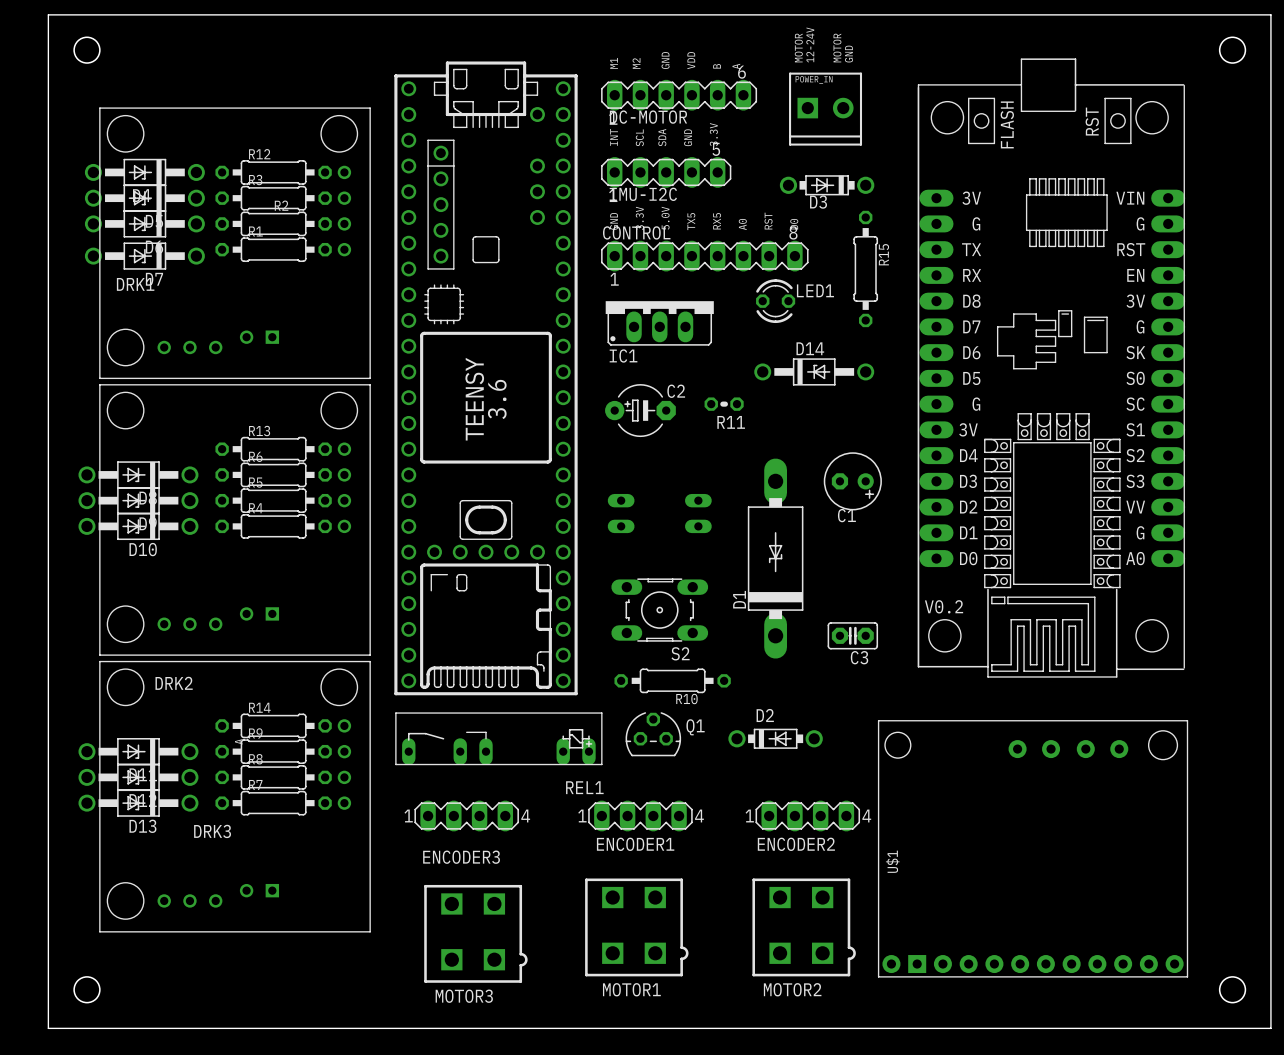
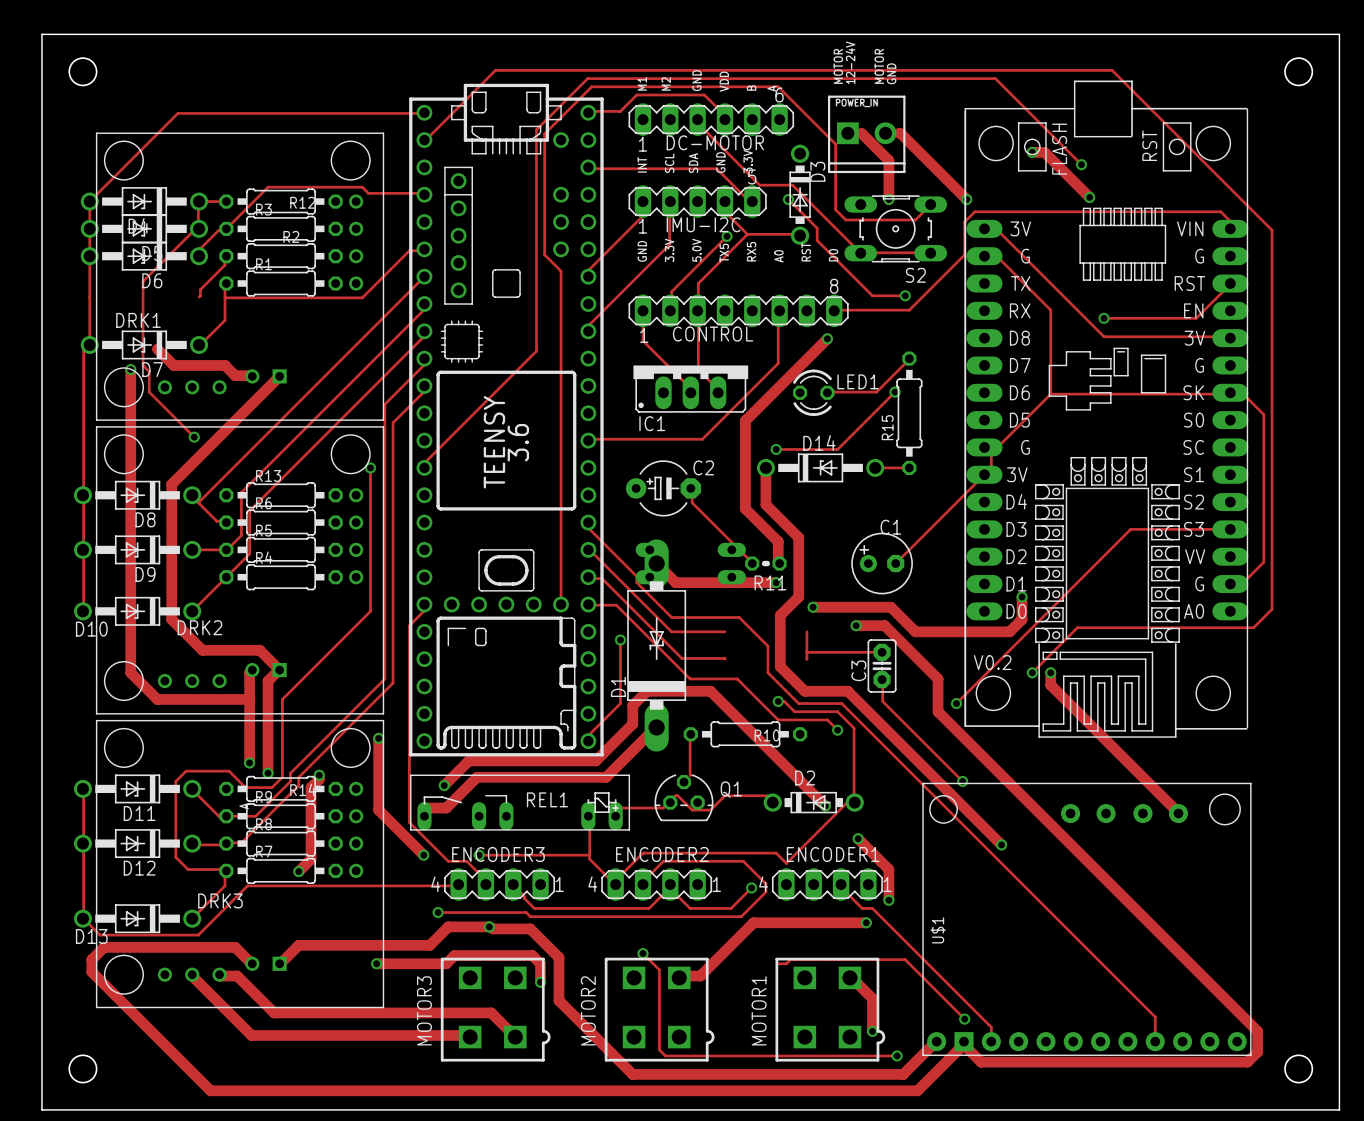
track: none -> (424, 112) (177, 113) (89, 201) (89, 344) (83, 351) (82, 611)
track: none -> (588, 112) (620, 111) (636, 95) (704, 95) (724, 115) (724, 119)
track: none -> (697, 119) (698, 123) (759, 185) (792, 185) (860, 253) (930, 253)
track: none -> (861, 133) (888, 160) (888, 199)
track: none -> (899, 133) (966, 199)
track: none -> (424, 140) (495, 70) (1112, 70) (1272, 230) (1272, 609) (1253, 627) (1077, 627) (1032, 672)
DC-MOTOR name position: DC-MOTOR (648, 117) -> DC-MOTOR (715, 142)
track: none -> (1032, 152) (1044, 152) (1089, 197)
via: none -> (1032, 152)
track: none -> (1081, 164) (995, 78) (587, 78) (536, 129) (536, 351) (425, 461) (424, 467)
via: none -> (1081, 164)
track: none -> (588, 167) (716, 168) (751, 203) (752, 208)
R12 name position: R12 (259, 154) -> R12 (302, 202)
track: none -> (424, 194) (368, 193) (362, 187) (268, 187) (225, 230) (218, 230) (199, 249)
via: none -> (1089, 197)
track: none -> (788, 199) (817, 228) (817, 240) (872, 295) (905, 295)
via: none -> (788, 199)
via: none -> (888, 199)
via: none -> (966, 199)
track: none -> (226, 201) (198, 201) (198, 226) (143, 281) (143, 365) (149, 371) (149, 392) (194, 437)
track: none -> (930, 204) (915, 219) (845, 219) (835, 209) (835, 144) (778, 86) (591, 86) (544, 133) (544, 254) (561, 271) (561, 604)
track: none -> (643, 208) (643, 215) (589, 269) (588, 276)
track: none -> (670, 208) (669, 244) (589, 324) (588, 331)
track: none -> (724, 208) (724, 211) (747, 234)
D3 rotation: 0° (827, 185) -> 90° counterclockwise (800, 194)
D3 position: (827, 185) -> (800, 194)
IMU-I2C name position: IMU-I2C (643, 194) -> IMU-I2C (703, 224)
track: none -> (991, 228) (997, 230) (1104, 336) (1237, 338)
track: none -> (1237, 228) (1220, 211) (974, 211) (964, 222) (964, 254) (909, 310) (834, 310)
D3 name position: D3 (818, 202) -> D3 (817, 171)
track: none -> (747, 234) (800, 235)
track: none -> (747, 234) (698, 283) (698, 369) (716, 388) (718, 392)
track: none -> (727, 236) (671, 291) (670, 310)
via: none -> (727, 236)
track: none -> (424, 249) (409, 250) (362, 297) (225, 297)
track: none -> (226, 256) (225, 265) (200, 289) (199, 297)
track: none -> (991, 256) (997, 256) (1050, 310) (1050, 394)
CONTROL name position: CONTROL (636, 232) -> CONTROL (713, 334)
track: none -> (424, 276) (198, 502)
track: none -> (226, 283) (225, 320) (199, 344)
track: none -> (1237, 283) (1231, 283) (1196, 318) (1104, 318)
R15 name position: R15 (883, 254) -> R15 (887, 427)
D7 position: (144, 256) -> (144, 344)
CONTROL position: (704, 256) -> (738, 310)
via: none -> (905, 295)
track: none -> (424, 304) (423, 310) (241, 492) (241, 535) (227, 549) (192, 549)
R15 position: (865, 268) -> (909, 413)
track: none -> (643, 310) (643, 340) (690, 388) (690, 392)
track: none -> (779, 310) (778, 363) (702, 439) (588, 440)
via: none -> (1104, 318)
track: none -> (424, 331) (423, 336) (249, 510) (249, 553) (192, 611)
LED1 position: (775, 301) -> (813, 392)
track: none -> (827, 338) (745, 420) (745, 508) (778, 541) (779, 563)
via: none -> (827, 338)
track: none -> (157, 349) (173, 365) (225, 365) (235, 375) (252, 376)
track: none -> (424, 358) (423, 365) (384, 404) (384, 678) (290, 773) (290, 781) (255, 816) (218, 816) (192, 788)
track: none -> (909, 358) (876, 392) (827, 392)
IC1 position: (659, 323) -> (690, 389)
track: none -> (130, 369) (130, 672) (157, 699) (249, 699)
via: none -> (130, 369)
track: none -> (279, 376) (171, 484) (171, 619) (202, 650) (259, 650) (279, 670) (268, 681) (268, 773)
track: none -> (424, 385) (423, 392) (393, 422) (393, 683) (298, 777) (298, 785) (241, 842) (196, 844) (192, 850)
track: none -> (895, 392) (837, 449) (776, 449)
via: none -> (895, 392)
track: none -> (1050, 394) (997, 447) (991, 447) (991, 476) (983, 476) (895, 563)
track: none -> (1050, 394) (1243, 394) (1263, 414) (1263, 562) (1243, 582) (1237, 584)
D14 position: (814, 371) -> (820, 467)
via: none -> (194, 437)
R11 position: (724, 404) -> (765, 563)
via: none -> (776, 449)
C2 position: (640, 410) -> (663, 488)
track: none -> (370, 467) (370, 611) (282, 699) (282, 777) (272, 787) (245, 787) (229, 771) (186, 771) (175, 781) (175, 857) (188, 869) (226, 870) (225, 885) (192, 918)
via: none -> (370, 467)
track: none -> (765, 467) (765, 504) (798, 537) (798, 597) (780, 615) (780, 666) (804, 691) (847, 691) (1001, 844)
track: none -> (875, 467) (909, 467)
track: none -> (690, 488) (692, 502) (752, 563)
track: none -> (192, 495) (216, 521) (226, 522)
D8 position: (138, 474) -> (137, 495)
track: none -> (588, 522) (589, 529) (636, 576) (636, 582) (671, 617) (739, 617) (767, 646) (767, 672) (798, 703) (841, 703) (1155, 1017) (1155, 1041)
C1 rotation: 0° (852, 481) -> 180° (882, 563)
track: none -> (1237, 529) (1130, 529) (956, 703)
track: none -> (588, 549) (671, 631) (724, 631)
track: none -> (656, 563) (675, 582) (776, 582)
D10 position: (138, 526) -> (137, 611)
track: none -> (588, 577) (602, 578) (681, 658) (724, 659)
via: none -> (776, 582)
track: none -> (1022, 597) (1022, 619) (1009, 631) (915, 631) (890, 607) (813, 607)
via: none -> (1022, 597)
D10 name position: D10 (143, 549) -> D10 (91, 629)
track: none -> (424, 604) (423, 611) (409, 625) (409, 822) (448, 861) (466, 861) (485, 879) (485, 884)
track: none -> (588, 604) (616, 605) (690, 678) (737, 678) (778, 719) (827, 719) (837, 730)
via: none -> (813, 607)
D1 position: (775, 558) -> (656, 645)
track: none -> (856, 625) (884, 625) (938, 678) (938, 711) (1257, 1031) (1257, 1051) (1247, 1062) (981, 1062) (962, 1041) (962, 1045) (917, 1090) (210, 1090) (91, 971) (91, 959) (104, 947) (235, 947) (252, 963)
via: none -> (856, 625)
track: none -> (806, 631) (806, 659)
track: none -> (620, 640) (620, 703) (589, 734) (588, 741)
via: none -> (620, 640)
track: none -> (806, 652) (882, 652)
S2 position: (659, 610) -> (895, 228)
track: none -> (252, 670) (249, 672) (249, 762)
via: none -> (1032, 672)
track: none -> (1050, 672) (1050, 685) (1178, 813)
via: none -> (1050, 672)
track: none -> (882, 679) (882, 701) (962, 781)
C3 rotation: 0° (852, 635) -> 90° clockwise (882, 665)
track: none -> (778, 701) (784, 701) (794, 711) (837, 711) (854, 728) (854, 795)
via: none -> (778, 701)
via: none -> (956, 703)
track: none -> (656, 727) (606, 777) (477, 777) (446, 808) (424, 809)
via: none -> (837, 730)
track: none -> (690, 734) (690, 775)
track: none -> (378, 738) (378, 810) (423, 855)
via: none -> (378, 738)
R10 position: (672, 680) -> (745, 734)
DRK2 name position: DRK2 (174, 683) -> DRK2 (199, 627)
R10 name position: R10 (686, 699) -> R10 (767, 735)
via: none -> (249, 762)
R14 name position: R14 (259, 707) -> R14 (302, 789)
via: none -> (268, 773)
track: none -> (319, 775) (319, 779) (311, 787) (311, 859) (298, 871)
via: none -> (319, 775)
via: none -> (962, 781)
track: none -> (444, 785) (468, 760) (595, 760) (632, 724) (632, 705) (647, 691) (710, 691) (825, 806)
via: none -> (444, 785)
track: none -> (82, 788) (83, 918)
track: none -> (772, 795) (724, 795) (710, 810) (692, 810) (677, 795) (663, 808) (615, 809)
track: none -> (854, 795) (786, 863) (776, 853) (643, 853) (616, 879) (615, 884) (589, 859) (588, 809)
via: none -> (825, 806)
D11 position: (138, 751) -> (137, 788)
track: none -> (858, 838) (888, 869) (888, 900)
via: none -> (858, 838)
via: none -> (1001, 844)
REL1 name position: REL1 (584, 787) -> REL1 (547, 799)
via: none -> (423, 855)
track: none -> (479, 855) (589, 855)
via: none -> (479, 855)
D13 position: (138, 803) -> (137, 918)
via: none -> (298, 871)
ENCODER3 text position: 1 (408, 816) -> 1 (559, 884)
track: none -> (458, 884) (247, 885) (198, 935) (100, 935) (83, 918)
ENCODER3 position: (466, 816) -> (499, 884)
track: none -> (513, 884) (534, 908) (649, 908) (671, 885) (670, 884) (669, 887) (690, 908) (731, 908) (751, 887)
ENCODER3 text position: 4 (525, 816) -> 4 (435, 884)
ENCODER1 text position: 1 (582, 816) -> 1 (887, 884)
track: none -> (643, 884) (643, 881) (663, 861) (743, 861) (765, 883) (765, 892) (741, 916) (530, 916) (526, 912) (438, 912)
ENCODER1 position: (640, 816) -> (827, 884)
ENCODER1 text position: 4 (699, 816) -> 4 (763, 884)
ENCODER2 text position: 1 (749, 816) -> 1 (716, 884)
track: none -> (841, 884) (839, 885) (862, 908) (872, 908) (991, 1027) (991, 1041)
ENCODER2 position: (807, 816) -> (656, 884)
ENCODER2 text position: 4 (866, 816) -> 4 (592, 884)
via: none -> (751, 887)
D13 name position: D13 (142, 826) -> D13 (91, 936)
via: none -> (888, 900)
via: none -> (438, 912)
ENCODER1 name position: ENCODER1 (635, 844) -> ENCODER1 (833, 854)
ENCODER2 name position: ENCODER2 (796, 844) -> ENCODER2 (662, 854)
track: none -> (866, 922) (753, 922) (700, 976) (679, 976) (679, 977)
via: none -> (866, 922)
via: none -> (489, 926)
ENCODER3 name position: ENCODER3 (461, 857) -> ENCODER3 (498, 854)
track: none -> (643, 953) (659, 969) (659, 1049) (665, 1055) (897, 1055)
via: none -> (643, 953)
track: none -> (279, 963) (298, 945) (429, 945) (448, 926) (530, 928) (558, 957) (558, 1000) (632, 1074) (903, 1074) (936, 1041)
track: none -> (376, 963) (446, 963) (454, 955) (532, 955) (540, 963) (540, 982)
via: none -> (376, 963)
track: none -> (778, 963) (786, 963) (790, 959) (905, 959) (964, 1019)
track: none -> (192, 974) (251, 1035) (468, 1035) (470, 1037)
track: none -> (219, 974) (237, 976) (274, 1012) (491, 1012) (515, 1037)
track: none -> (849, 977) (872, 998) (872, 1031)
via: none -> (540, 982)
MOTOR1 position: (636, 927) -> (830, 1009)
MOTOR2 position: (804, 927) -> (659, 1009)
via: none -> (964, 1019)
via: none -> (872, 1031)
via: none -> (897, 1055)
MOTOR1 name rotation: 0° (631, 989) -> 90° counterclockwise (759, 1010)
MOTOR1 name position: MOTOR1 (631, 989) -> MOTOR1 (759, 1010)
MOTOR2 name rotation: 0° (792, 989) -> 90° counterclockwise (588, 1010)
MOTOR2 name position: MOTOR2 (792, 989) -> MOTOR2 (588, 1010)
MOTOR3 name rotation: 0° (464, 996) -> 90° counterclockwise (424, 1010)
MOTOR3 name position: MOTOR3 (464, 996) -> MOTOR3 (424, 1010)

